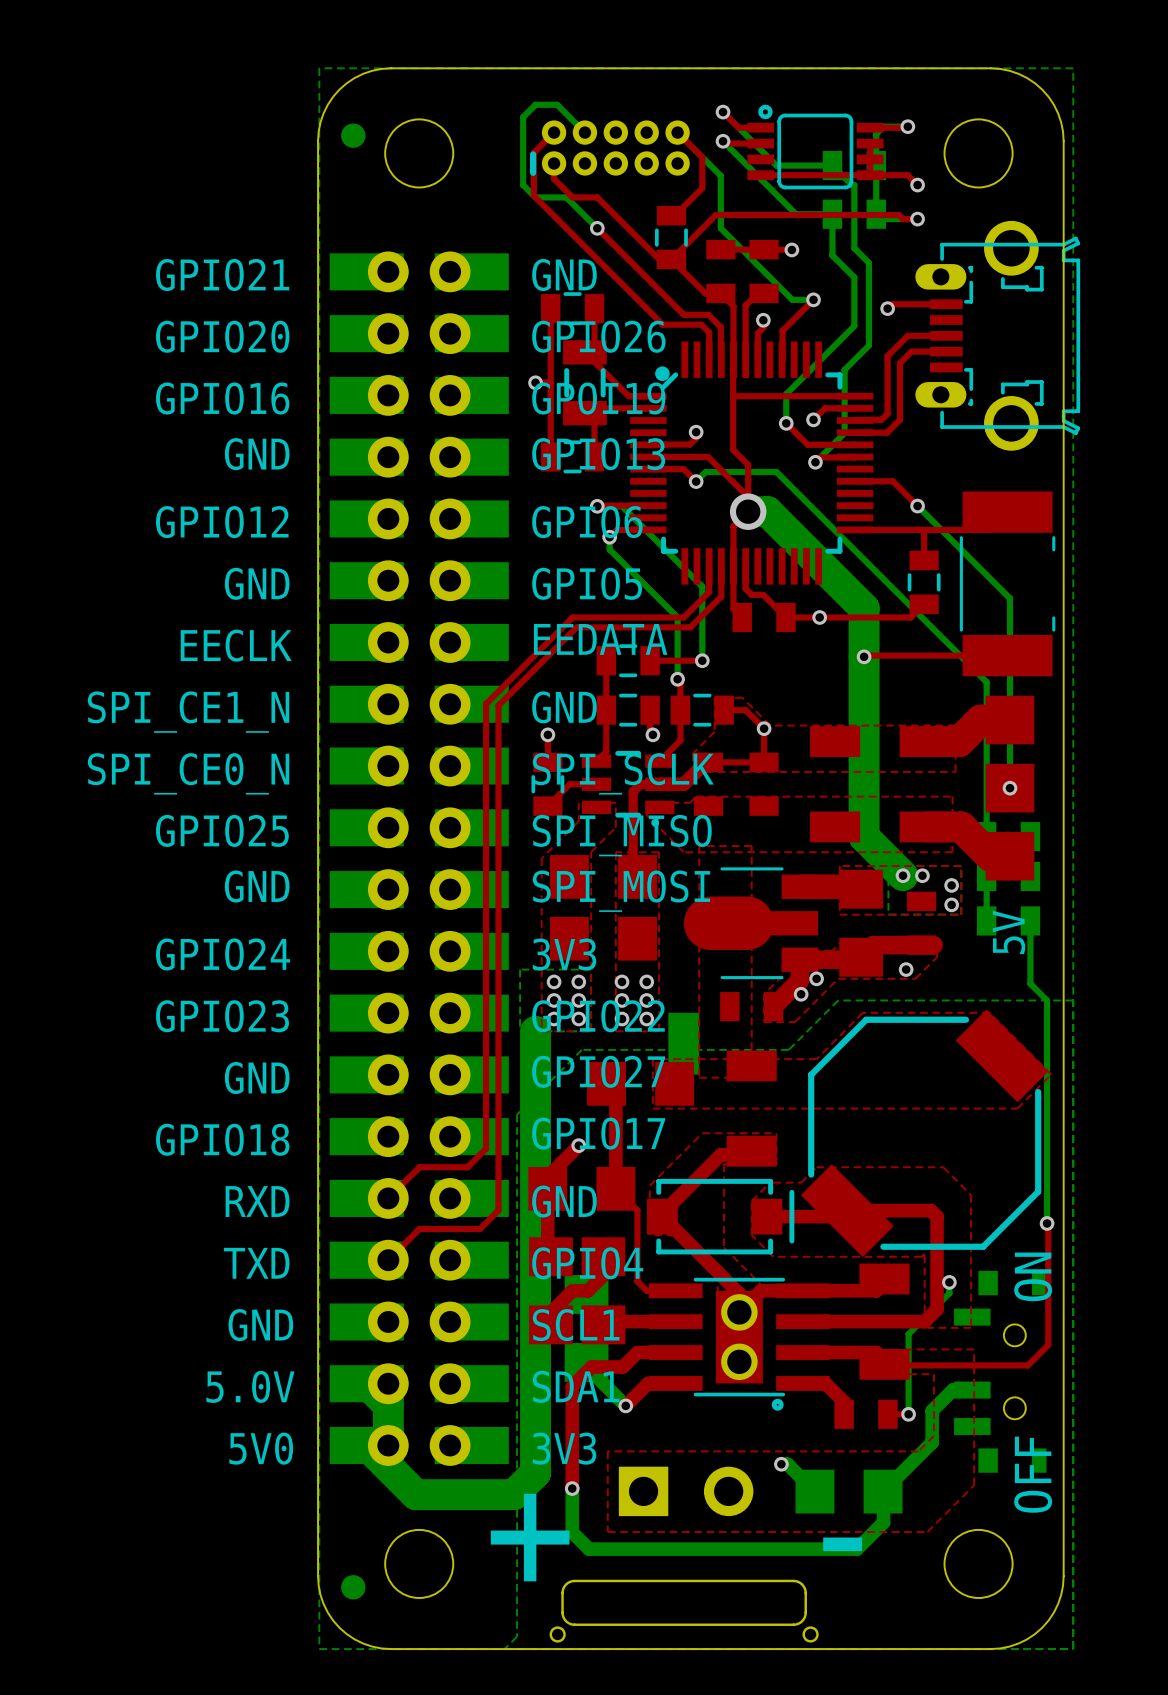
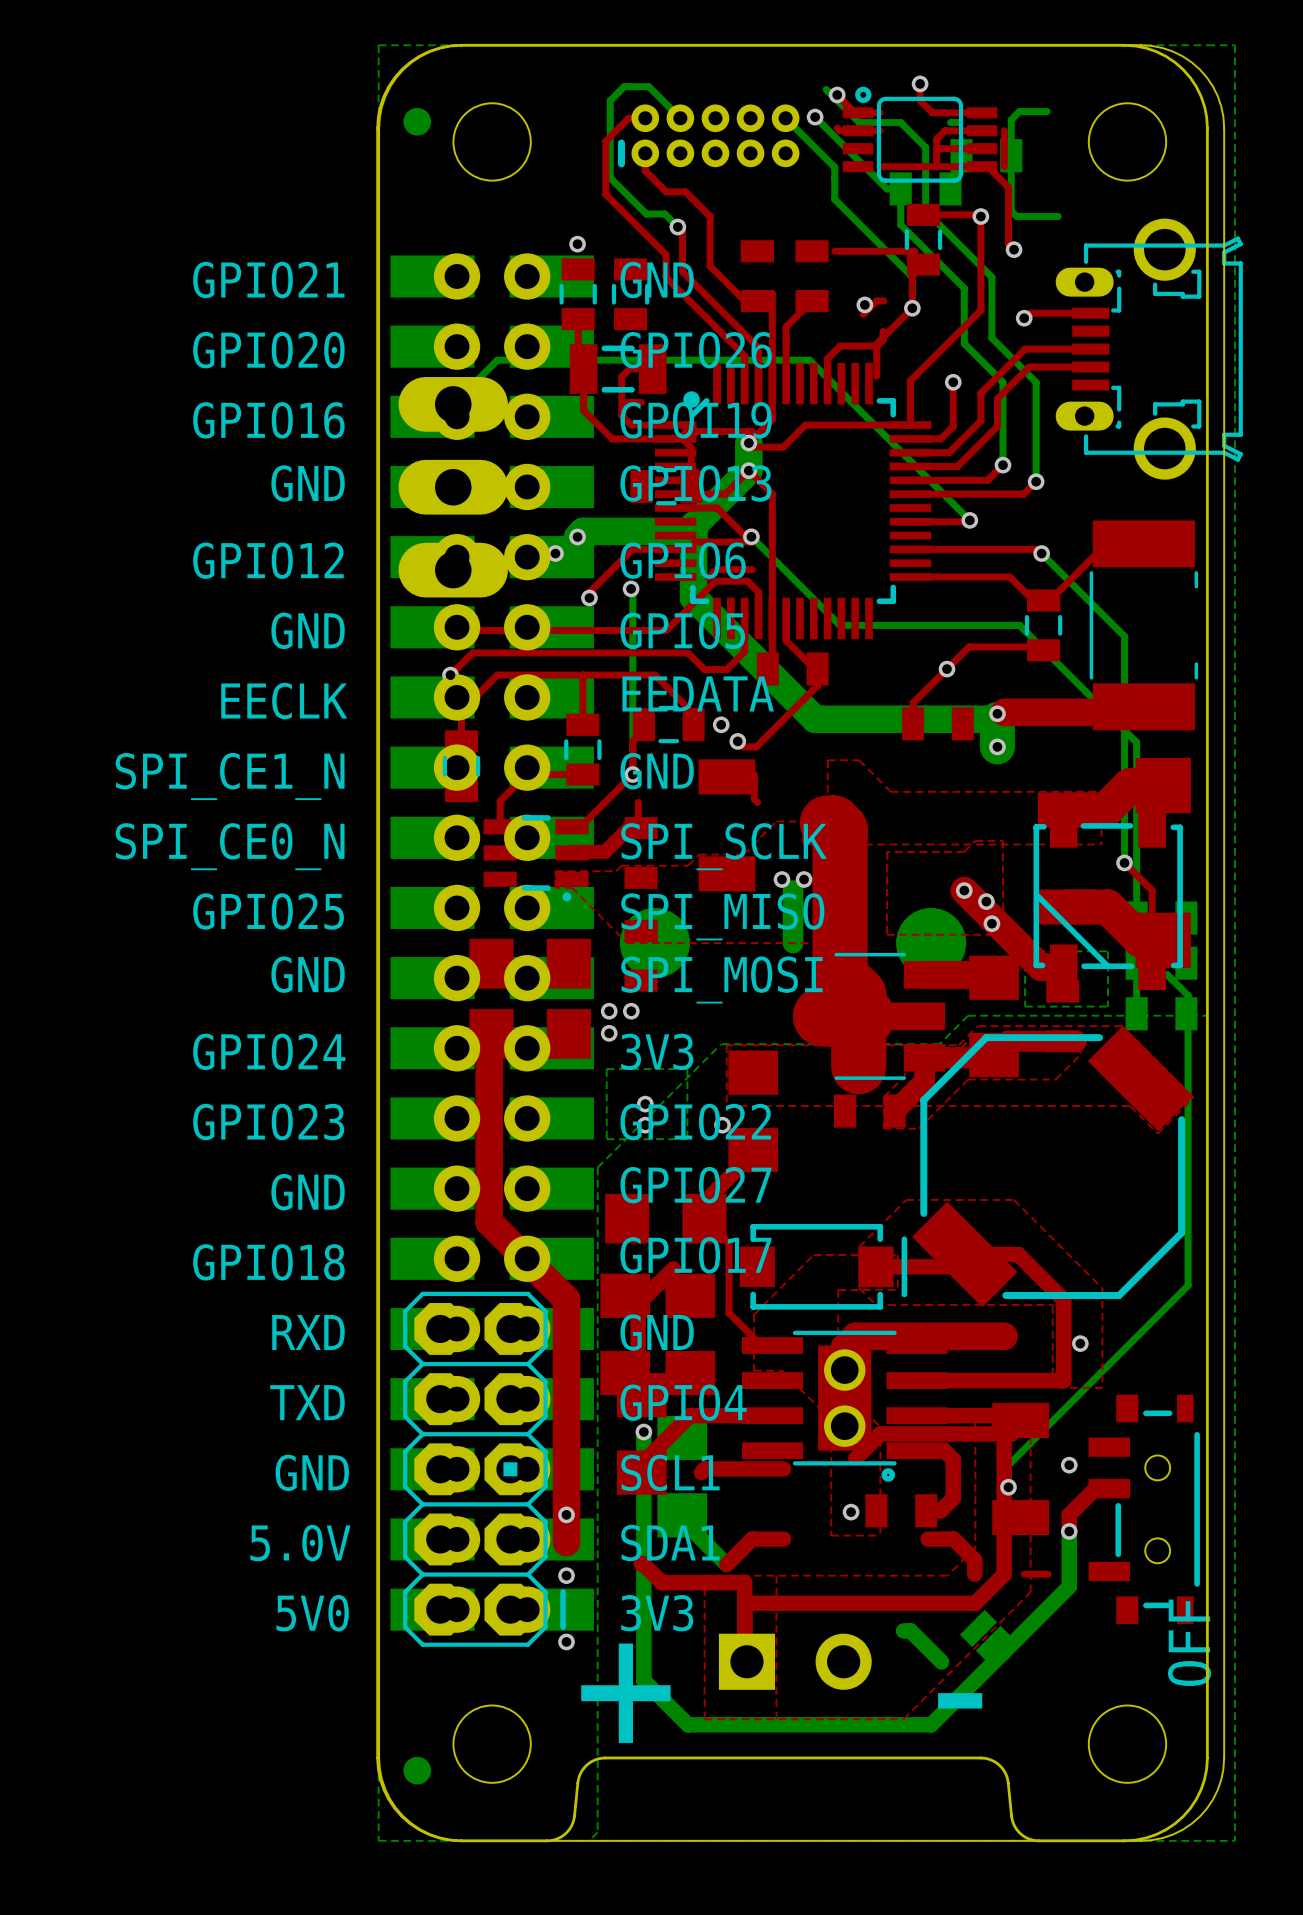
board edge: none -> (461, 45) (1135, 45) (1156, 51) (1174, 62) (1190, 77) (1201, 96) (1207, 128) (1207, 1757) (1204, 1779) (1190, 1808) (1174, 1823) (1156, 1834) (1124, 1840) (1039, 1840) (1029, 1839) (1020, 1833) (1013, 1822) (1007, 1779) (1003, 1770) (993, 1761) (980, 1757) (598, 1758) (586, 1765) (579, 1776) (573, 1819) (569, 1828) (560, 1837) (547, 1840) (461, 1840) (440, 1838) (411, 1823) (395, 1808) (384, 1789) (378, 1757) (378, 128) (384, 96) (402, 69) (429, 51) (461, 45)
top track: none -> (920, 83) (920, 100) (932, 112) (982, 112)
via: none -> (920, 83)
bottom track: none -> (826, 89) (859, 122) (900, 122) (925, 147) (925, 211) (991, 277) (991, 338) (1036, 382) (1036, 481)
bottom track: (723, 112) (776, 165) (832, 165) (851, 185) (854, 185) (854, 248) (868, 262) (868, 345) (844, 369) (844, 433) (815, 462) -> none
top track: (907, 126) (870, 127) -> none
via: (907, 126) -> none
bottom track: none -> (815, 117) (886, 188) (900, 188) (900, 224) (964, 288) (964, 343) (1002, 382) (1002, 465)
top track: none -> (634, 118) (628, 118) (605, 141) (605, 194) (665, 254) (665, 277) (744, 356) (744, 383)
top track: (554, 132) (533, 152) (533, 195) (662, 324) (701, 324) (709, 332) (709, 359) -> none
top track: (677, 132) (702, 157) (702, 188) (674, 215) (671, 215) -> none
bottom track: none -> (950, 122) (958, 122)
bottom track: (723, 141) (796, 214) (832, 214) (832, 255) (854, 277) (854, 326) (786, 394) (786, 423) -> none
via position: (723, 141) -> (815, 117)
top track: none -> (982, 130) (945, 130) (936, 139) (936, 166)
part position: (815, 147) -> (920, 134)
top track: none -> (982, 148) (936, 150)
top track: (855, 175) (907, 175) (917, 185) -> (987, 166) (1008, 187) (1008, 244) (1014, 249)
via: (917, 185) -> none
bottom track: (535, 197) (566, 197) (597, 228) -> (624, 191) (646, 214) (664, 214) (677, 227)
top track: (589, 197) (597, 197) (659, 259) (671, 259) -> (685, 191) (710, 216) (710, 266) (744, 301) (757, 301) (772, 293) (772, 419) (748, 443) (752, 447) (783, 447) (805, 425) (910, 425) (910, 380) (980, 310) (980, 216) (979, 214) (923, 214)
bottom track: (720, 204) (720, 228) (792, 299) (813, 299) -> (834, 199) (912, 277) (912, 308)
part position: (854, 214) -> (925, 188)
via: none -> (980, 216)
top track: (917, 219) (903, 219) (898, 215) (715, 215) (671, 259) -> none
via: (917, 219) -> none
top track: none -> (677, 227) (682, 231) (682, 271) (758, 347) (758, 383)
top track: (597, 228) (683, 314) (708, 314) (720, 327) (721, 359) -> none
via position: (597, 228) -> (677, 227)
part: (671, 237) -> none
part: none -> (923, 239)
via: none -> (577, 244)
via: none -> (1014, 249)
via: (791, 249) -> none
top track: (671, 259) (705, 293) (720, 293) (733, 306) (733, 359) -> none
top track: none -> (923, 264) (912, 275) (912, 308) (874, 346) (840, 346) (827, 358) (827, 383)
part position: (720, 271) -> (812, 276)
part position: (764, 271) -> (757, 276)
part: none -> (578, 294)
top track: none -> (812, 301) (786, 326) (786, 383)
via: none -> (864, 304)
via: none -> (912, 308)
top track: (813, 299) (782, 330) (782, 359) -> none
via: (813, 299) -> none
top track: (745, 305) (745, 359) -> none
top track: (550, 308) (550, 456) -> none
part rotation: 0° (572, 308) -> 90° clockwise (630, 294)
top track: (594, 308) (594, 342) (584, 352) (628, 396) (648, 396) -> none
top track: none -> (578, 319) (578, 363) (583, 369) (583, 410) (612, 438) (675, 438)
via: (763, 320) -> none
top track: (907, 335) (892, 351) -> (1051, 367) (1029, 367)
top track: none -> (1047, 349) (1025, 349) (980, 393) (980, 420) (949, 452) (910, 452)
top track: (911, 351) (899, 363) (899, 419) (887, 432) (855, 432) -> none
top track: none -> (652, 368) (629, 368) (621, 376) (621, 415) (631, 425) (675, 425)
top track: (887, 356) (887, 413) (881, 419) (855, 420) -> (1024, 372) (997, 398) (997, 426) (957, 466) (910, 466)
top track: (733, 359) (733, 449) (748, 464) (748, 511) (733, 526) (733, 608) (742, 617) -> none
top track: none -> (953, 382) (953, 426) (940, 438) (910, 438)
via: none -> (953, 382)
via: (535, 382) -> none
part rotation: 0° (584, 382) -> 90° clockwise (618, 369)
part position: (584, 382) -> (618, 369)
bottom track: none -> (453, 404) (497, 360) (809, 360) (969, 520)
part: none -> (453, 404)
top track: (733, 395) (855, 396) -> none
top track: (855, 408) (824, 408) (813, 419) -> none
via: none -> (748, 443)
via: (813, 419) -> none
top track: (786, 423) (807, 444) (855, 444) -> none
via: (786, 423) -> none
top track: (696, 432) (696, 438) (689, 444) (648, 444) -> none
via: (696, 432) -> none
top track: none -> (1002, 465) (987, 480) (910, 480)
via: none -> (1002, 465)
via: none -> (748, 470)
top track: none -> (1036, 481) (1023, 494) (910, 494)
via: none -> (1036, 481)
top track: (648, 456) (708, 456) (748, 497) -> none
top track: (855, 456) (820, 457) (815, 462) -> none
part: none -> (453, 487)
via: (815, 462) -> none
top track: none -> (675, 494) (725, 494) (748, 470) (772, 494) (772, 664) (767, 669)
part position: (751, 463) -> (793, 501)
top track: (648, 469) (683, 469) (696, 481) -> none
top track: none -> (675, 507) (717, 507) (745, 536) (751, 536)
bottom track: (696, 481) (705, 472) (776, 472) (883, 579) -> (751, 536) (840, 625) (1019, 625)
via: (696, 481) -> none
top track: (855, 481) (892, 481) (917, 506) -> none
top track: none -> (969, 520) (910, 521)
via: none -> (969, 520)
bottom track: none -> (693, 531) (583, 531) (577, 536)
via: none -> (577, 536)
via: none -> (751, 536)
bottom track: (597, 506) (622, 506) (702, 586) (702, 660) -> none
via: (597, 506) -> none
bottom track: (917, 506) (1010, 598) (1010, 788) -> none
via position: (917, 506) -> (1041, 553)
top track: none -> (1143, 543) (1106, 543) (1049, 600) (1033, 600) (1009, 577) (910, 577)
bottom track: (748, 511) (767, 511) (864, 608) (864, 661) -> (748, 443) (748, 470) (693, 525) (693, 597) (815, 719) (997, 719)
via: (748, 511) -> none
top track: none -> (675, 549) (632, 549) (589, 592) (589, 598)
top track: none -> (910, 549) (1037, 549) (1041, 553)
top track: (972, 512) (1007, 512) (989, 529) (855, 529) -> none
via: none -> (555, 553)
bottom track: none -> (1041, 553) (1124, 636) (1124, 862)
top track: (922, 529) (924, 531) (924, 560) -> none
part: none -> (453, 570)
bottom track: (609, 537) (609, 549) (677, 617) (677, 679) -> none
via: (609, 537) -> none
bottom track: none -> (631, 588) (632, 590) (632, 774)
via: none -> (631, 588)
via: none -> (589, 598)
top track: (709, 566) (709, 592) (683, 617) (572, 617) (486, 703) (486, 1148) (467, 1167) (419, 1167) (388, 1198) -> none
top track: (721, 566) (721, 596) (690, 627) (576, 627) (498, 705) (498, 1210) (479, 1229) (419, 1229) (388, 1260) -> none
top track: (745, 566) (745, 588) (751, 594) (763, 594) (785, 617) (910, 617) (924, 604) -> none
top track: none -> (744, 618) (744, 651) (726, 669) (704, 669) (688, 652) (472, 652) (450, 675)
top track: none -> (758, 618) (758, 592) (747, 581) (715, 581) (666, 630) (467, 630)
top track: none -> (786, 618) (786, 640) (814, 669) (817, 669) (817, 685) (756, 746) (743, 746) (737, 741)
part position: (924, 582) -> (1043, 625)
part position: (1007, 583) -> (1143, 625)
top track: none -> (1043, 650) (1040, 646) (969, 646) (913, 703) (913, 723)
part: none -> (792, 669)
part: (764, 617) -> none
via: none -> (450, 675)
top track: none -> (582, 675) (582, 724)
top track width: thin (870, 655) (988, 655) -> thick (1004, 712) (1138, 712)
top track: (606, 660) (606, 751) (596, 761) -> none
part: (628, 660) -> none
top track: (650, 660) (702, 660) -> none
via: (702, 660) -> none
part: none -> (937, 723)
top track: none -> (643, 724) (643, 730) (632, 741) (632, 774) (580, 826) (572, 826)
part: none -> (668, 724)
top track: none -> (693, 724) (693, 713) (654, 675) (497, 675) (461, 711) (461, 741) (468, 739)
via: none -> (721, 724)
top track: (677, 679) (680, 682) (680, 740) (659, 761) -> none
via: (677, 679) -> none
via: none -> (737, 741)
bottom track: (864, 686) (864, 836) (903, 875) -> none
via: none -> (997, 746)
part: none -> (582, 749)
part: none -> (461, 766)
top track: none -> (582, 774) (526, 774) (500, 801) (500, 826)
part: (628, 710) -> none
part: (702, 710) -> none
top track: (724, 710) (745, 710) (764, 728) (764, 762) (705, 762) (683, 784) (640, 784) (633, 791) (633, 872) (637, 876) -> none
via: (764, 728) -> none
via position: (547, 734) -> (632, 774)
via: (652, 734) -> none
top zone outline: none -> (776, 821) (820, 821) (820, 943) (627, 943) (572, 887) (555, 887) (555, 871) (616, 871) (621, 865) (688, 865) (699, 854) (743, 854) (776, 821)
part footprint: [531, 752, 565, 816] -> [624, 817, 658, 889]
part: none -> (726, 825)
top track: none -> (641, 828) (628, 828) (605, 851) (572, 853)
top zone outline: none -> (975, 840) (1002, 840) (1002, 934) (886, 934) (886, 851) (964, 851) (975, 840)
top track: (596, 784) (569, 784) (547, 806) -> none
part: (708, 784) -> none
part: (764, 784) -> none
part: (835, 784) -> none
part position: (628, 788) -> (536, 858)
top track: none -> (1124, 862) (1152, 890) (1152, 967)
part: (1010, 788) -> none
via position: (1010, 788) -> (1124, 862)
top zone outline: (696, 796) (689, 802) (646, 802) (646, 815) (683, 852) (952, 852) (952, 796) (696, 796) -> none
top zone outline: (578, 802) (578, 821) (541, 858) (541, 1031) (591, 1031) (591, 852) (615, 827) (615, 802) (578, 802) -> none
via: none -> (781, 879)
via: none -> (804, 879)
bottom track: none -> (793, 890) (793, 943)
top track: none -> (964, 890) (1041, 967) (1063, 967)
via: none -> (964, 890)
part: none -> (1108, 896)
via: none -> (986, 901)
top track: none -> (856, 917) (858, 914) (858, 851) (856, 851) (827, 823) (833, 823) (840, 829) (840, 976) (858, 994) (858, 1066)
via: none -> (991, 923)
top zone outline: (699, 846) (751, 846) (751, 1077) (699, 1077) (699, 846) -> none
top zone outline: (615, 852) (615, 1031) (659, 1031) (659, 852) (615, 852) -> none
part: none -> (654, 943)
part: none -> (931, 943)
top zone outline: (839, 865) (839, 914) (961, 914) (961, 865) (839, 865) -> none
part: none -> (641, 955)
via: (903, 875) -> none
via: (922, 875) -> none
part: none -> (530, 963)
part: (603, 876) -> none
via: (951, 885) -> none
bottom track: none -> (1167, 974) (1188, 995) (1188, 1285) (1008, 1465) (1008, 1487)
via: (951, 904) -> none
via: none -> (609, 1011)
via: none -> (631, 1011)
bottom track: (1030, 920) (1030, 983) (1047, 1000) (1047, 1223) -> none
top zone outline: none -> (977, 1026) (1121, 1026) (1193, 1097) (1157, 1133) (1130, 1106) (726, 1106) (726, 1045) (958, 1045) (977, 1026)
text: 5V (1009, 932) -> none
top track: none -> (491, 1033) (489, 1036) (489, 1222) (566, 1299) (566, 1542)
part: none -> (530, 1033)
via: none -> (609, 1033)
part: (603, 938) -> none
via: (906, 969) -> none
via: (816, 978) -> none
via: (554, 981) -> none
via: (578, 981) -> none
via: (622, 981) -> none
via: (646, 981) -> none
via: (801, 994) -> none
via: (578, 1000) -> none
via: (622, 1000) -> none
via: (646, 1000) -> none
bottom zone outline: (1073, 1000) (838, 1000) (788, 1049) (581, 1049) (517, 1114) (517, 1636) (512, 1641) -> (1207, 1015) (968, 1015) (939, 1044) (721, 1044) (597, 1167) (597, 1832)
part: none -> (753, 1111)
top zone outline: (862, 1012) (989, 1012) (1051, 1074) (1017, 1108) (652, 1108) (652, 1059) (816, 1059) (862, 1012) -> none
via: (578, 1019) -> none
via: (646, 1019) -> none
bottom track: (535, 1031) (535, 1473) (513, 1494) (415, 1494) (366, 1445) (388, 1445) (388, 1405) (366, 1383) (388, 1383) -> none
top track: none -> (753, 1150) (754, 1151) (704, 1202) (704, 1218) (728, 1243) (728, 1313) (761, 1345) (772, 1345)
part: (683, 1043) -> none
top track: (606, 1083) (615, 1093) (615, 1188) (637, 1210) (637, 1281) (646, 1290) (675, 1290) -> none
part: (640, 1083) -> none
top zone outline: none -> (906, 1199) (1014, 1199) (1102, 1288) (1102, 1387) (1052, 1387) (1052, 1304) (875, 1304) (859, 1288) (859, 1246) (906, 1199)
part: none -> (665, 1218)
part: (751, 1108) -> none
part position: (924, 1133) -> (1052, 1166)
top track: none -> (876, 1266) (952, 1266) (964, 1254) (1018, 1254) (1063, 1299) (1063, 1380) (917, 1380)
via: (578, 1145) -> none
top track: (751, 1147) (744, 1154) (720, 1154) (662, 1213) (662, 1216) (739, 1293) (739, 1337) -> none
top zone outline: (816, 1167) (801, 1182) (770, 1182) (751, 1201) (751, 1235) (773, 1256) (921, 1256) (924, 1253) (924, 1324) (927, 1327) (971, 1327) (971, 1195) (943, 1167) (816, 1167) -> none
part rotation: 0° (581, 1188) -> 90° clockwise (690, 1334)
part: none -> (625, 1334)
top track: none -> (1004, 1336) (855, 1336) (844, 1347) (844, 1370)
via: none -> (1080, 1343)
part position: (720, 1216) -> (823, 1266)
top track: (766, 1216) (841, 1216) (847, 1210) (931, 1210) (937, 1216) (937, 1309) (924, 1321) (803, 1321) -> none
top track: (1047, 1223) (1048, 1345) (1027, 1365) (889, 1365) (876, 1352) (803, 1352) -> none
via: (1047, 1223) -> none
top track: (603, 1256) (603, 1275) (588, 1290) (572, 1290) (550, 1312) (550, 1324) -> none
top track: none -> (772, 1415) (690, 1415) (641, 1464) (641, 1486)
top track: none -> (917, 1415) (995, 1415) (1004, 1424) (1004, 1574) (975, 1603) (744, 1603)
text: ON (1033, 1276) -> none
bottom track: (949, 1282) (949, 1293) (908, 1334) (908, 1414) -> none
via: (949, 1282) -> none
bottom track: none -> (643, 1432) (643, 1680) (688, 1724) (931, 1724) (1069, 1586) (1069, 1531)
via: none -> (643, 1432)
part: (603, 1290) -> none
top track: none -> (938, 1450) (917, 1450) (944, 1450) (953, 1459) (953, 1498) (940, 1510) (926, 1510)
via: none -> (1069, 1465)
part: none -> (484, 1469)
via: none -> (1008, 1487)
top track: none -> (1109, 1488) (1095, 1488) (1069, 1514) (1069, 1531)
part position: (739, 1344) -> (844, 1406)
top zone outline: (906, 1349) (974, 1349) (974, 1485) (927, 1532) (607, 1532) (607, 1451) (918, 1451) (933, 1435) (933, 1374) (909, 1374) (906, 1371) (906, 1349) -> (975, 1409) (975, 1548) (947, 1575) (704, 1575) (704, 1719) (903, 1719) (1030, 1592) (1030, 1409) (975, 1409)
top track: (675, 1352) (637, 1352) (623, 1366) (591, 1366) (572, 1386) (572, 1488) -> none
via: none -> (851, 1512)
via: none -> (566, 1514)
part side: bottom (1000, 1371) -> top (1144, 1509)
via: none -> (1069, 1531)
bottom track: (972, 1390) (952, 1390) (932, 1410) (932, 1442) (883, 1491) (883, 1522) (857, 1549) (589, 1549) (572, 1532) (572, 1488) -> none
top track: none -> (641, 1564) (661, 1582) (744, 1582) (744, 1658)
via: (625, 1405) -> none
part position: (866, 1414) -> (901, 1510)
via: (908, 1414) -> none
via: none -> (566, 1575)
top zone outline: none -> (776, 1575) (776, 1719)
via: (781, 1464) -> none
part footprint: [795, 1469, 903, 1514] -> [959, 1609, 1013, 1663]
via: none -> (566, 1641)
via: (572, 1488) -> none
text position: + (530, 1537) -> + (625, 1693)
text position: - (842, 1544) -> - (960, 1700)
board edge: (574, 1580) (795, 1581) (802, 1584) (805, 1589) (805, 1614) (802, 1621) (793, 1624) (573, 1624) (566, 1621) (562, 1615) (562, 1593) (566, 1584) (574, 1580) -> none
round board edge: [549, 1626, 566, 1643] -> none
round board edge: [802, 1626, 819, 1643] -> none

